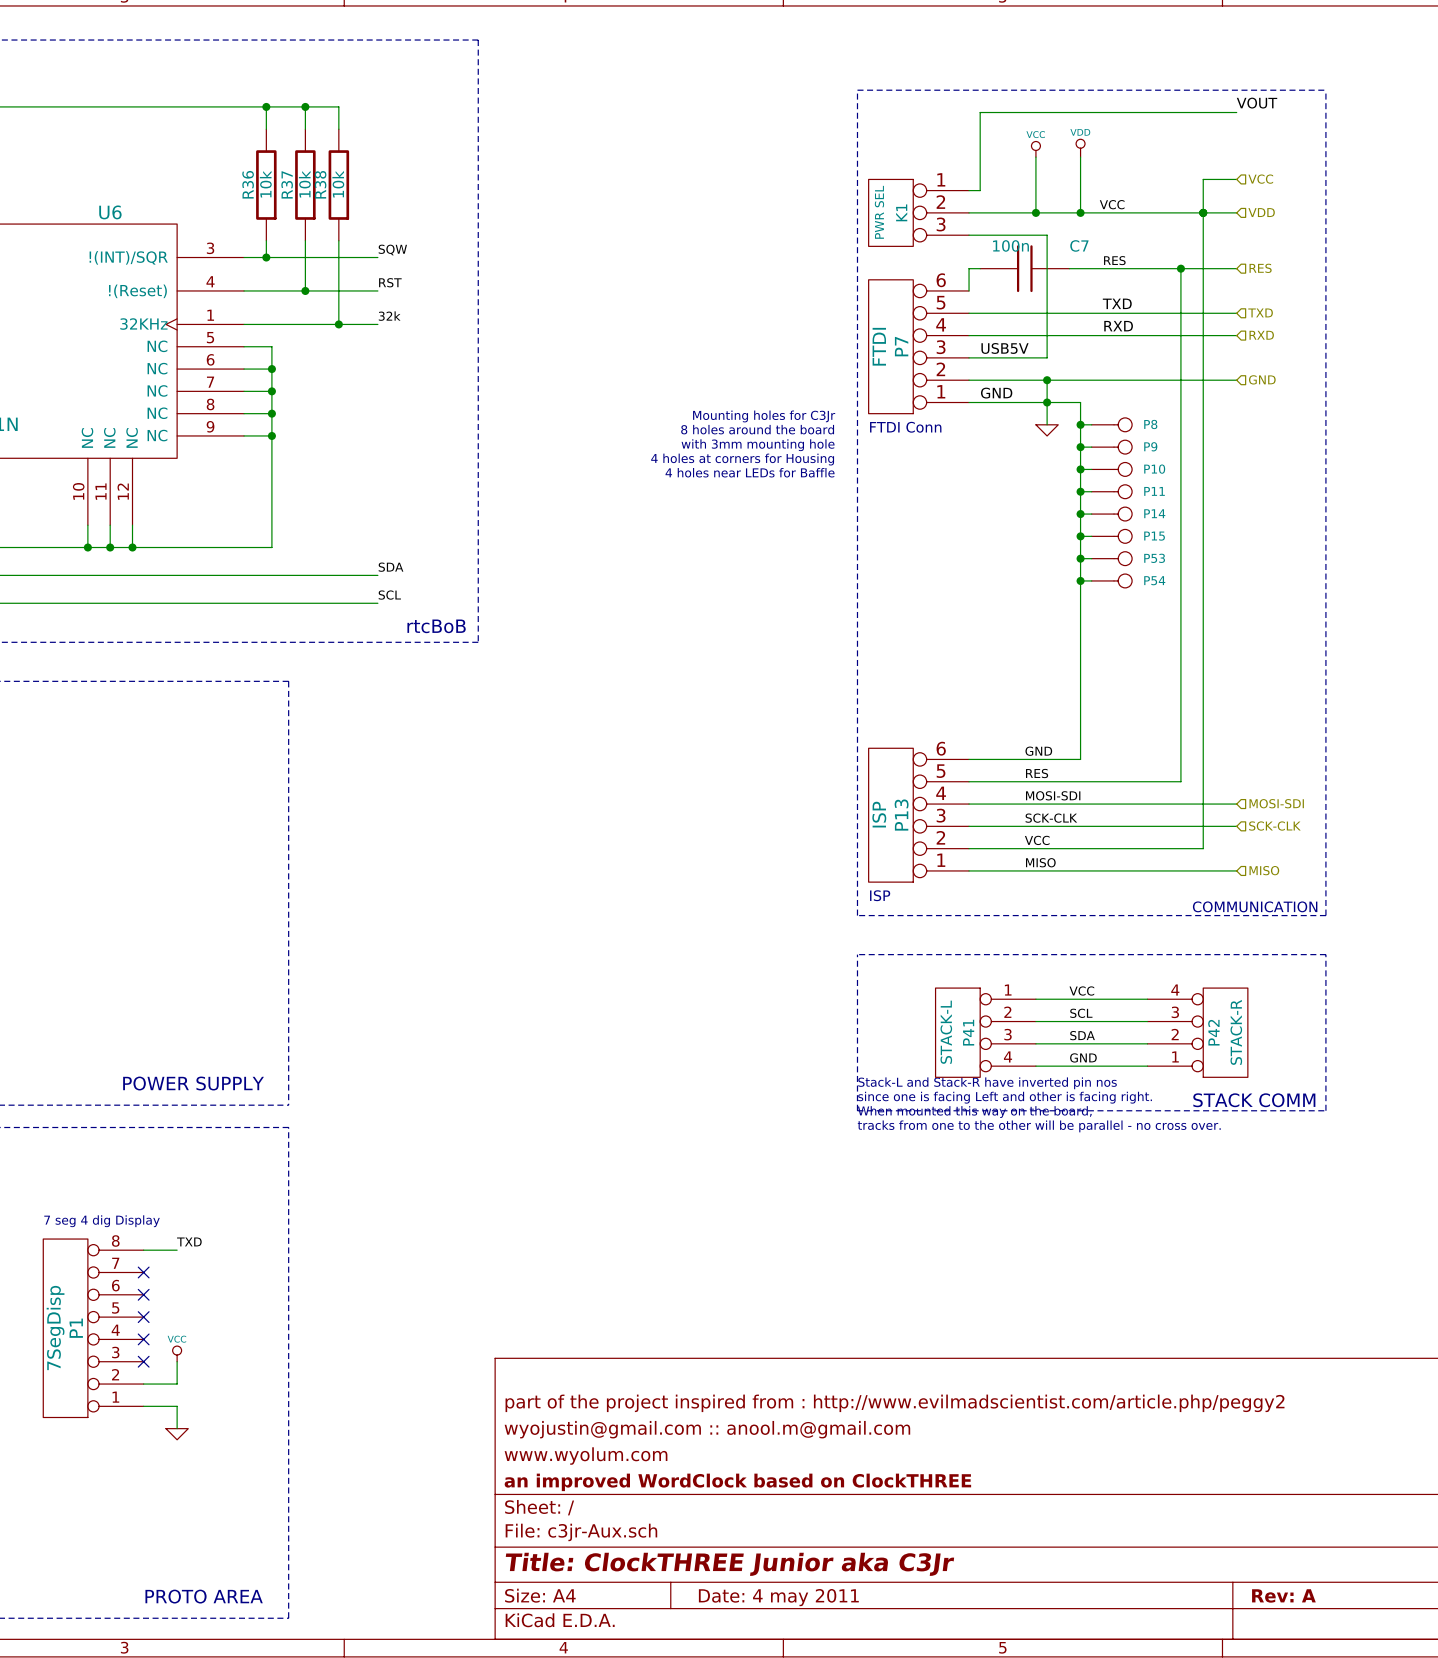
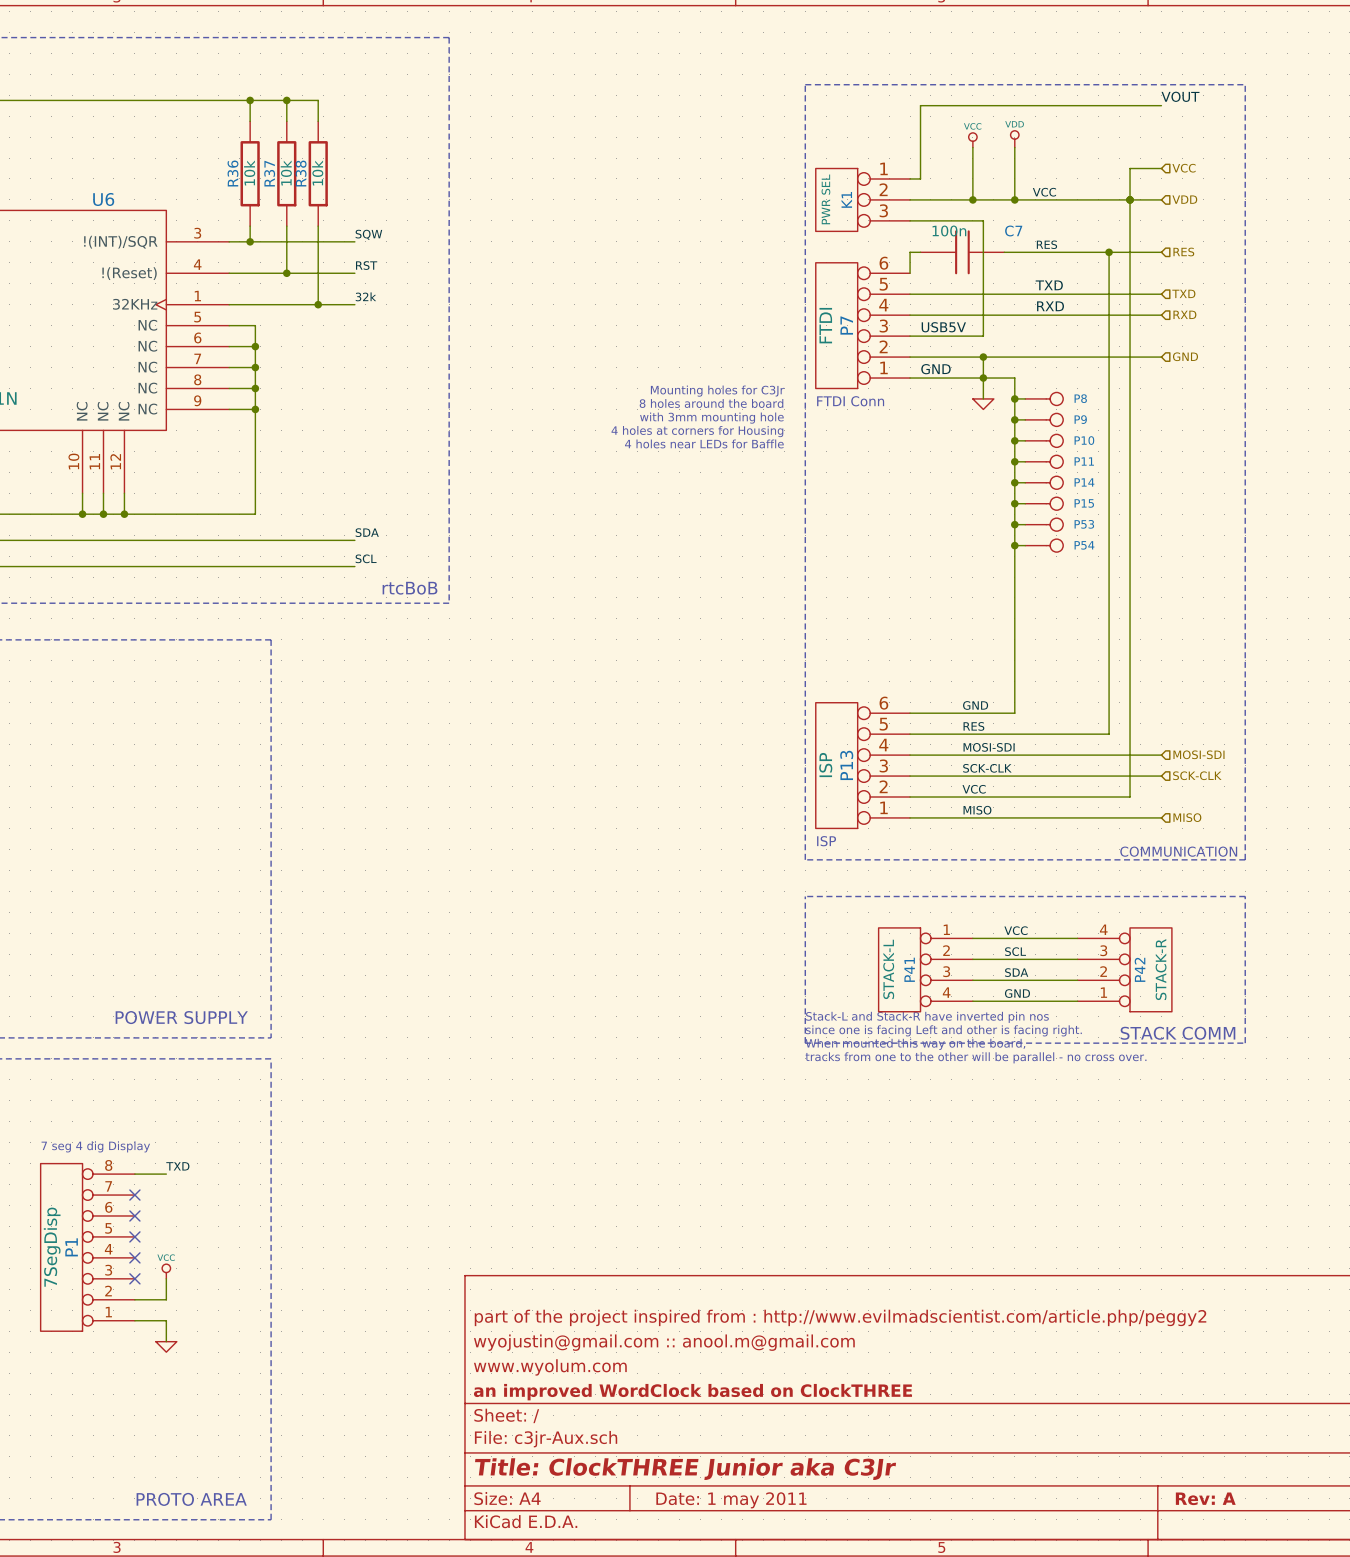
title block: Date: 4 may 2011 (778, 1597) -> Date: 1 may 2011 (731, 1500)

